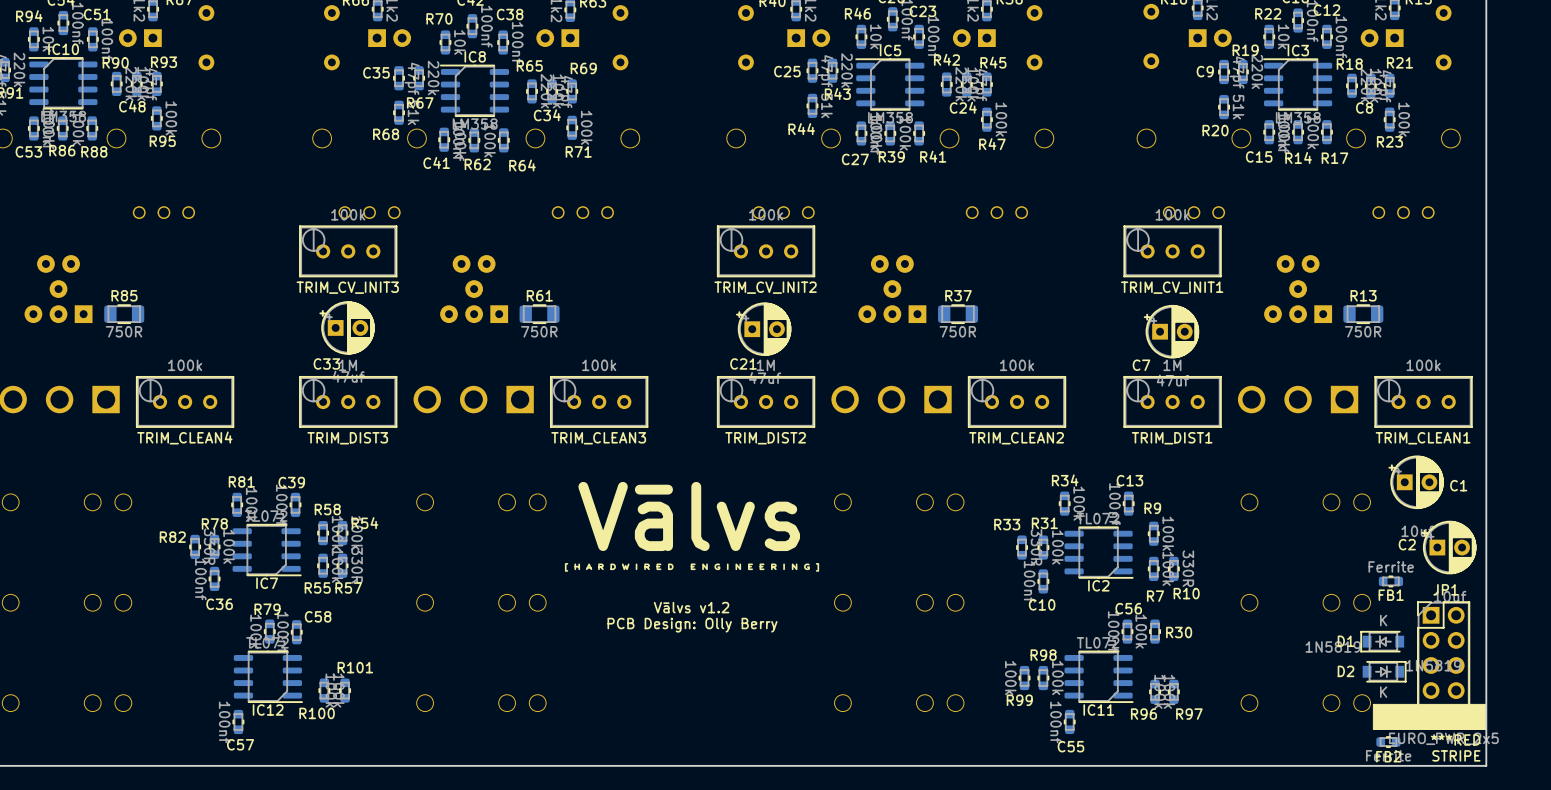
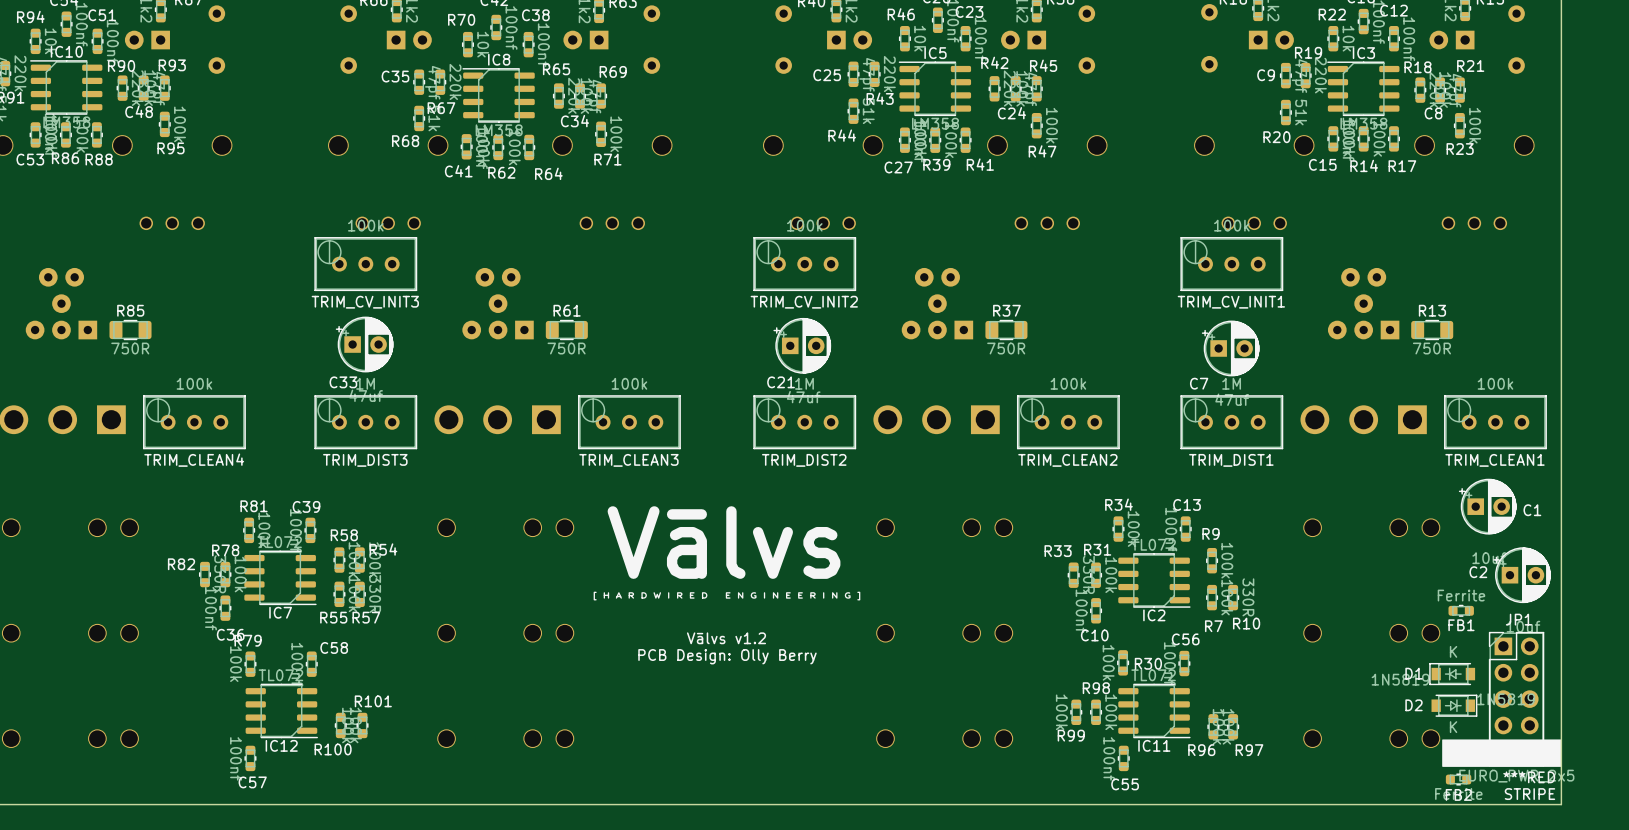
R79 position: (269, 631) -> (250, 664)
R30 position: (1155, 631) -> (1123, 662)

